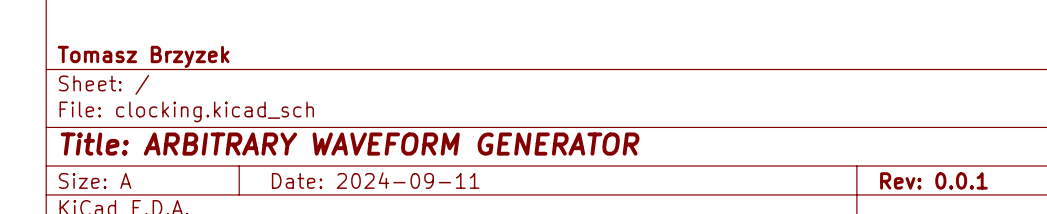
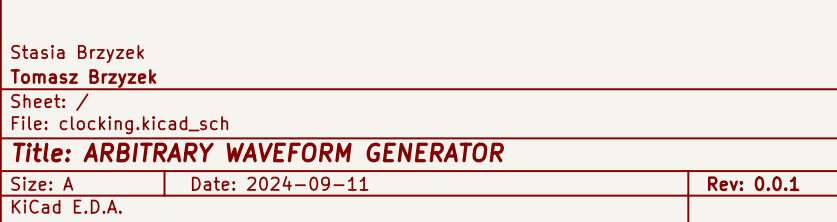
title block: none -> Stasia Brzyzek (77, 54)

